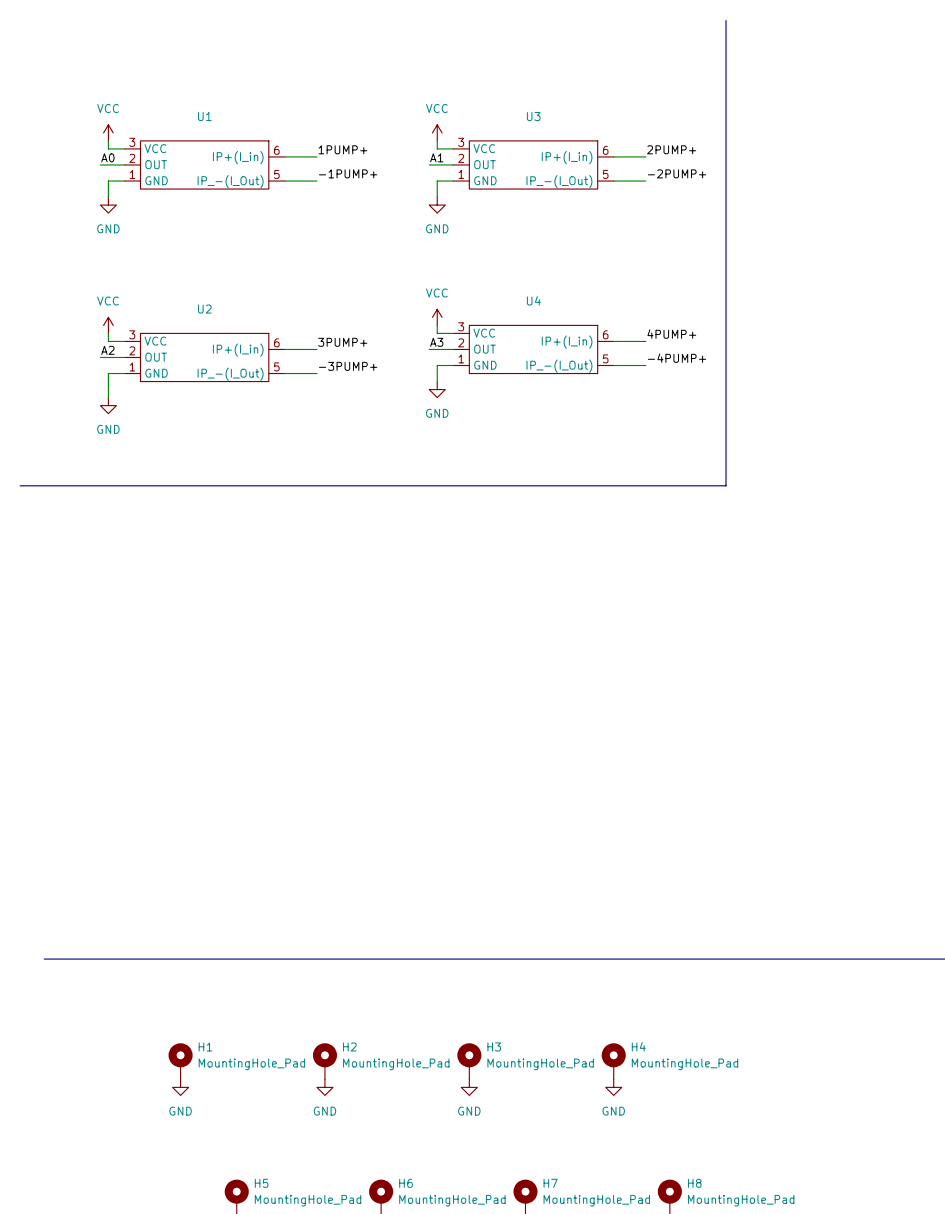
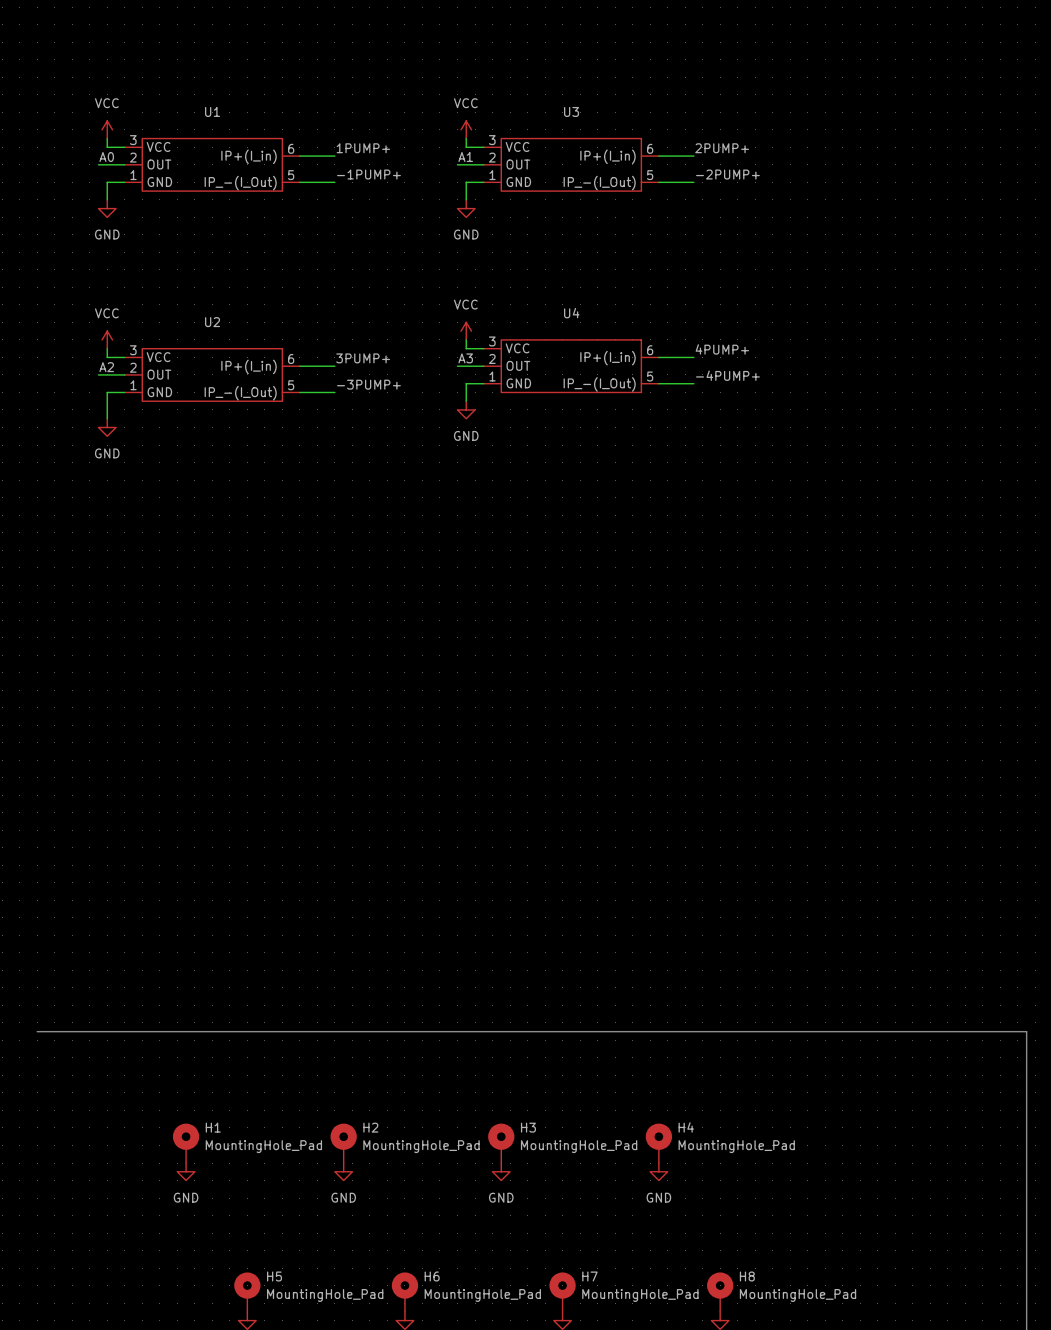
line: (726, 20) (726, 485) (20, 485) -> none

